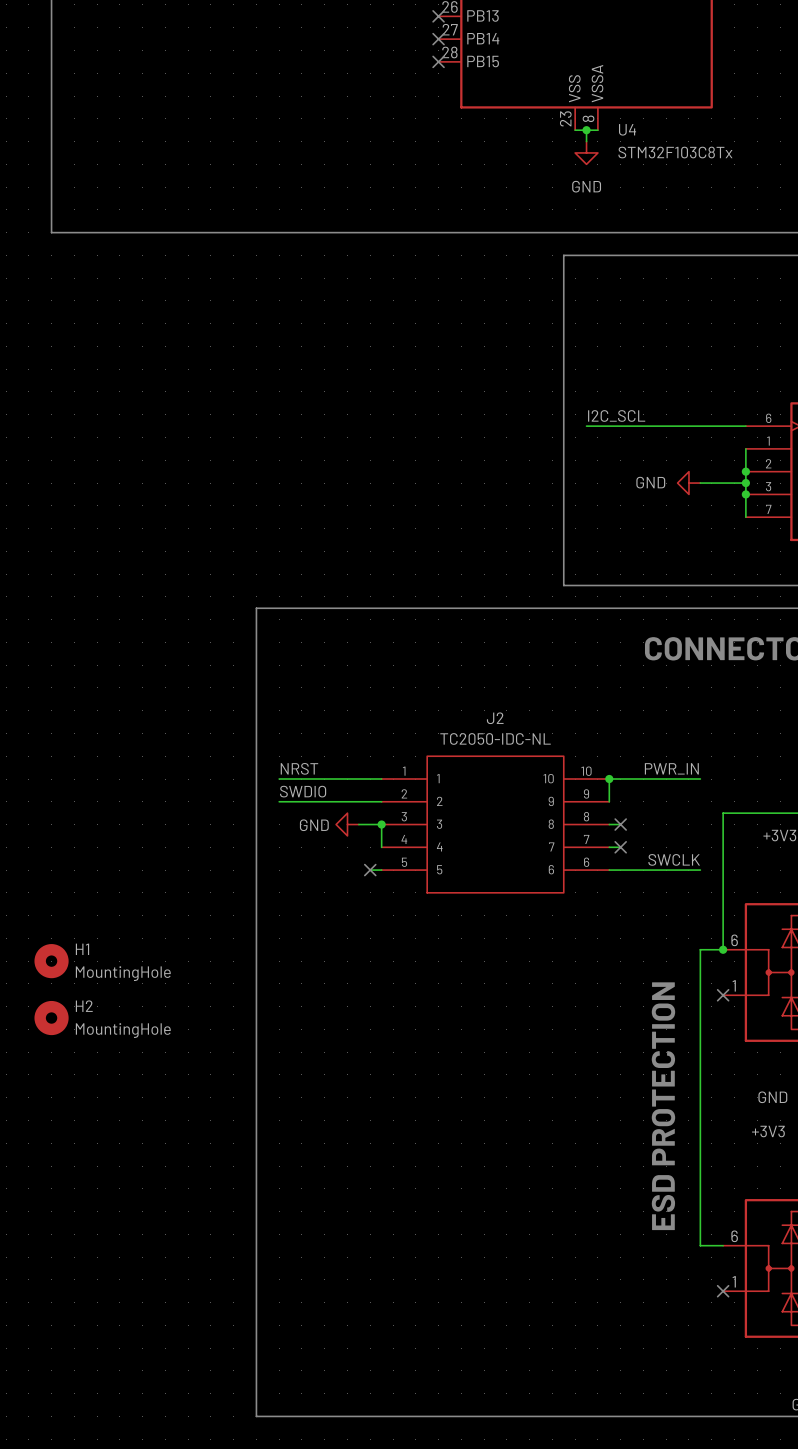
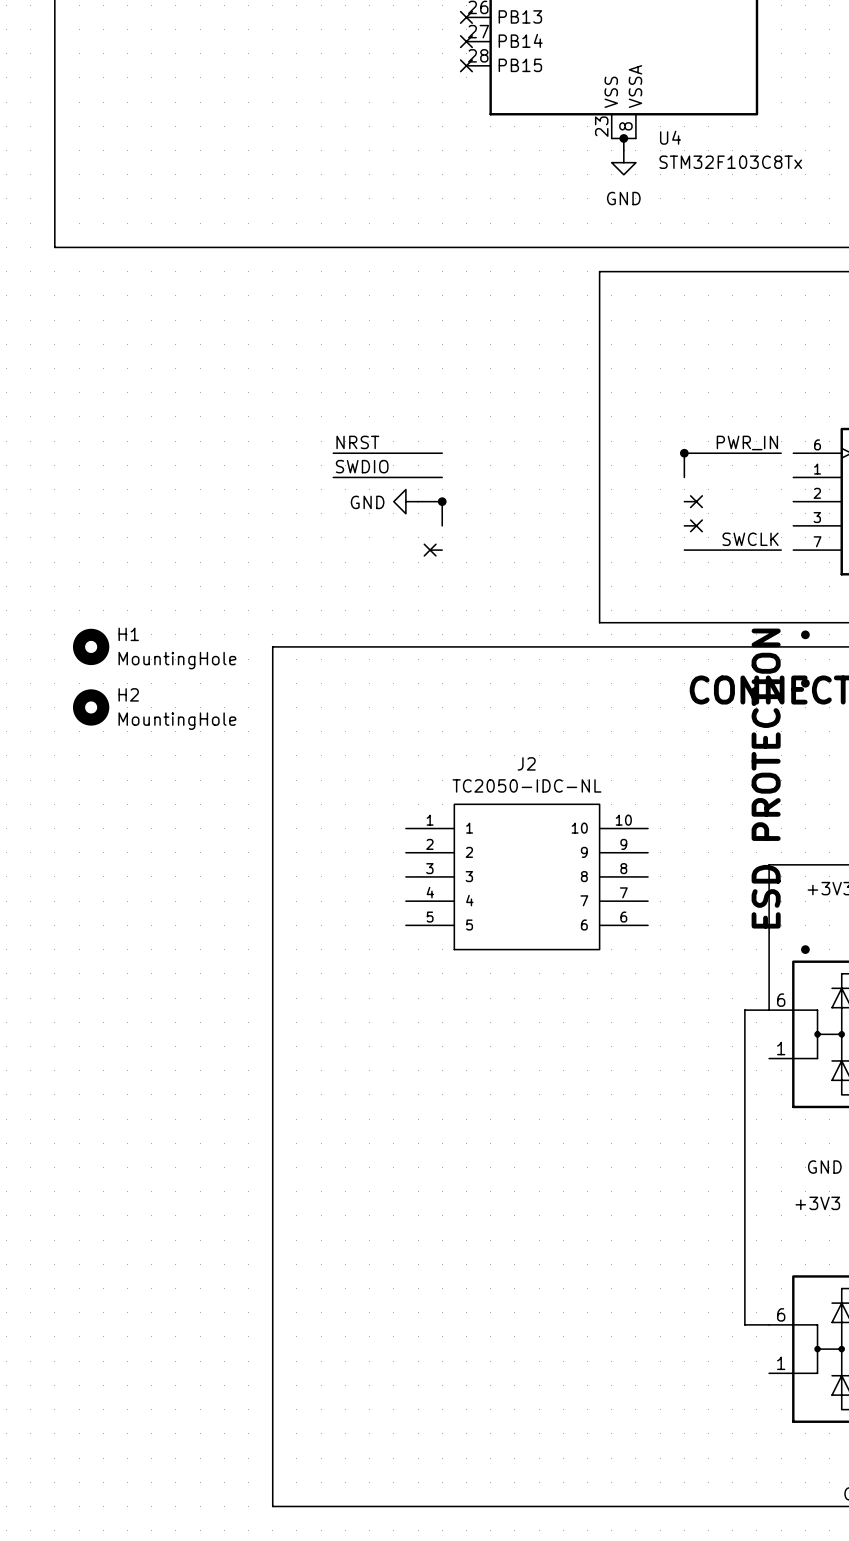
label: none -> NRST (357, 442)
label: I2C_SCL (616, 415) -> none
label: none -> PWR_IN (747, 443)
wire: none -> (333, 453) (442, 453)
wire: (586, 426) (643, 426) -> (684, 477) (684, 453)
junction: none -> (684, 453)
wire: (734, 426) (745, 426) -> (684, 501) (696, 501)
label: none -> SWDIO (362, 466)
wire: none -> (333, 477) (442, 477)
wire: (745, 448) (745, 517) -> none
power symbol: none -> GND (405, 501)
wire: none -> (418, 501) (442, 501) (442, 525)
junction: none -> (442, 501)
no-connect mark: none -> (696, 501)
junction: (745, 471) -> none
power symbol: GND (688, 483) -> none
wire: (700, 483) (745, 483) -> none
junction: (745, 483) -> none
wire: none -> (684, 525) (696, 525)
no-connect mark: none -> (696, 525)
junction: (745, 494) -> none
label: none -> SWCLK (750, 539)
wire: none -> (430, 550) (442, 550)
no-connect mark: none -> (430, 550)
wire: none -> (684, 550) (781, 550)
junction: none -> (805, 634)
junction: none -> (805, 683)
text: none -> ESD PROTECTION (766, 778)
label: NRST (299, 768) -> none
label: PWR_IN (671, 768) -> none
wire: (279, 779) (381, 779) -> none
junction: (609, 779) -> none
wire: (700, 779) (609, 779) (609, 801) -> none
label: SWDIO (303, 791) -> none
wire: (279, 801) (381, 801) -> none
power symbol: GND (347, 824) -> none
wire: (358, 824) (381, 824) (381, 847) -> none
junction: (381, 824) -> none
wire: (609, 824) (620, 824) -> none
no-connect mark: (620, 824) -> none
wire: (609, 847) (620, 847) -> none
no-connect mark: (620, 847) -> none
label: SWCLK (674, 859) -> none
wire: (370, 870) (381, 870) -> none
no-connect mark: (370, 870) -> none
wire: (609, 870) (700, 870) -> none
junction: none -> (805, 949)
junction: (723, 949) -> none
H1 position: (51, 961) -> (91, 646)
no-connect mark: (723, 995) -> none
H2 position: (51, 1018) -> (91, 707)
text: ESD PROTECTION (663, 1106) -> none
no-connect mark: (723, 1291) -> none

